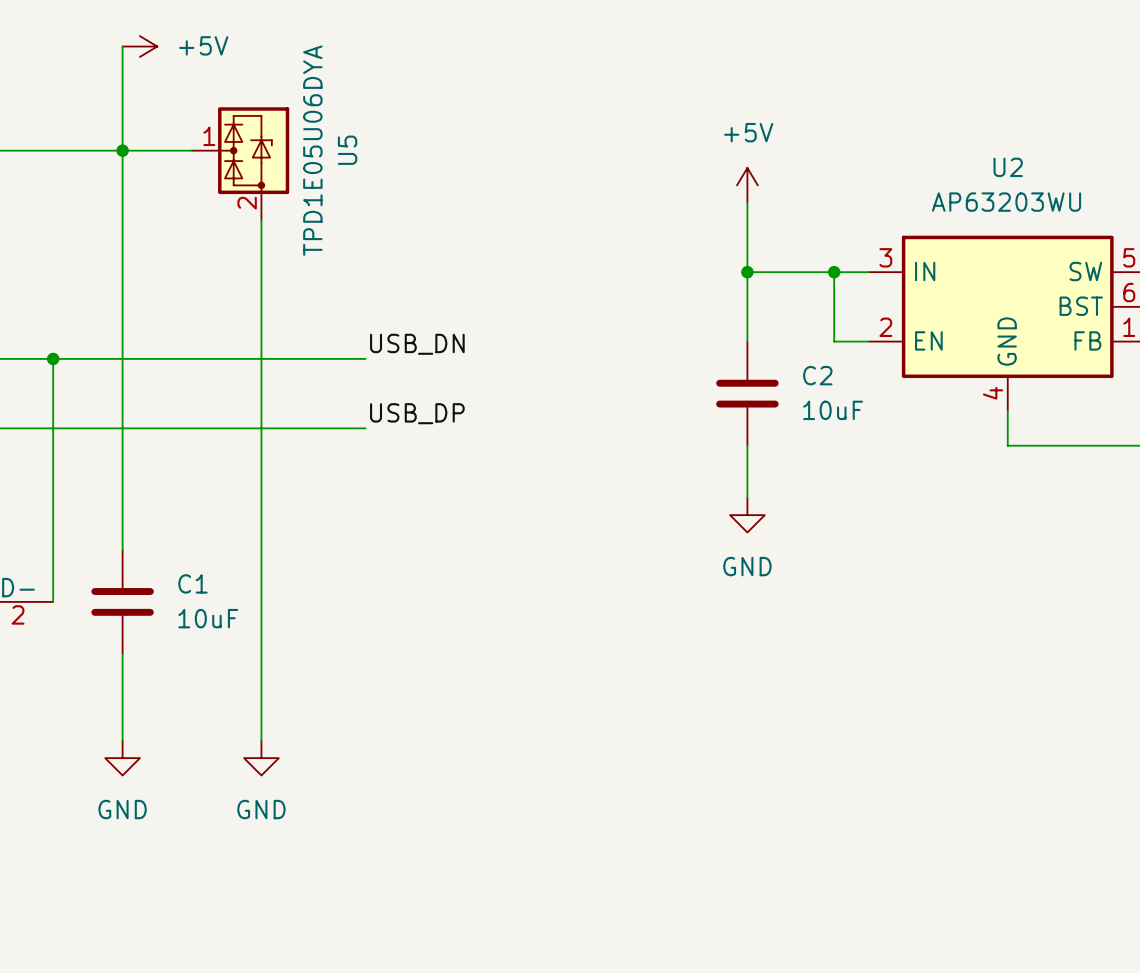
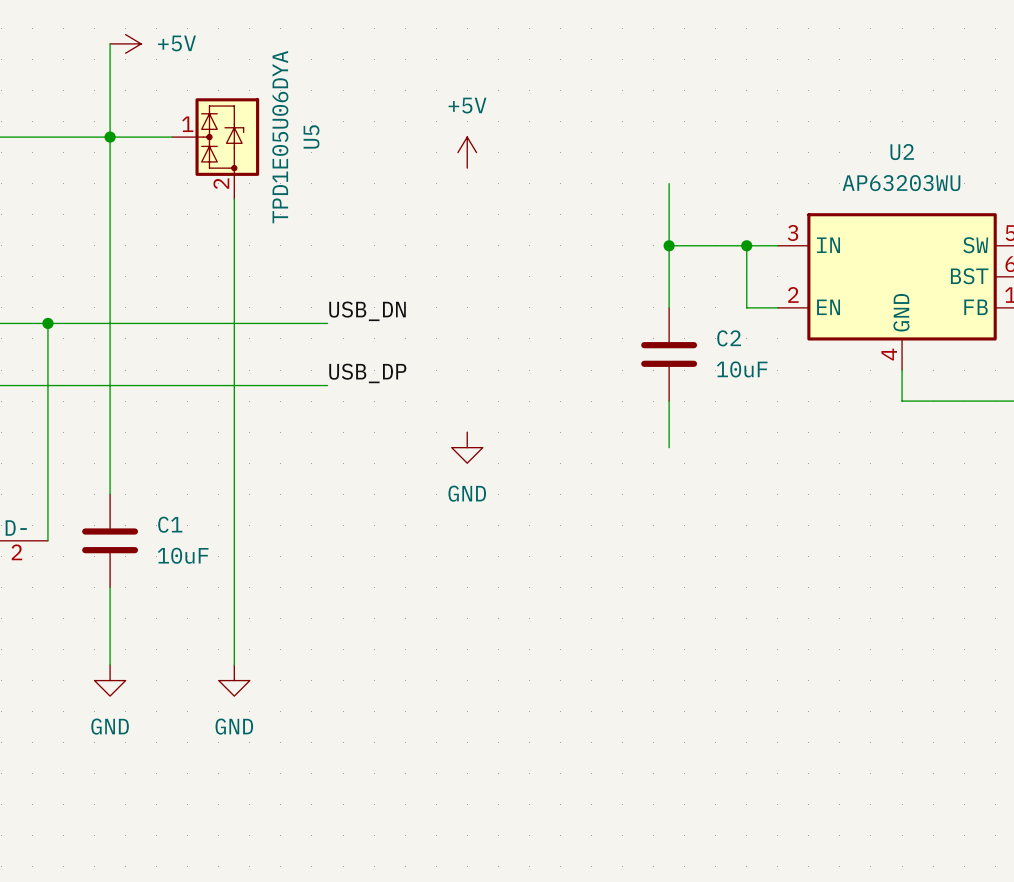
power symbol position: +5V (747, 185) -> +5V (467, 152)
power symbol position: GND (747, 515) -> GND (467, 447)

